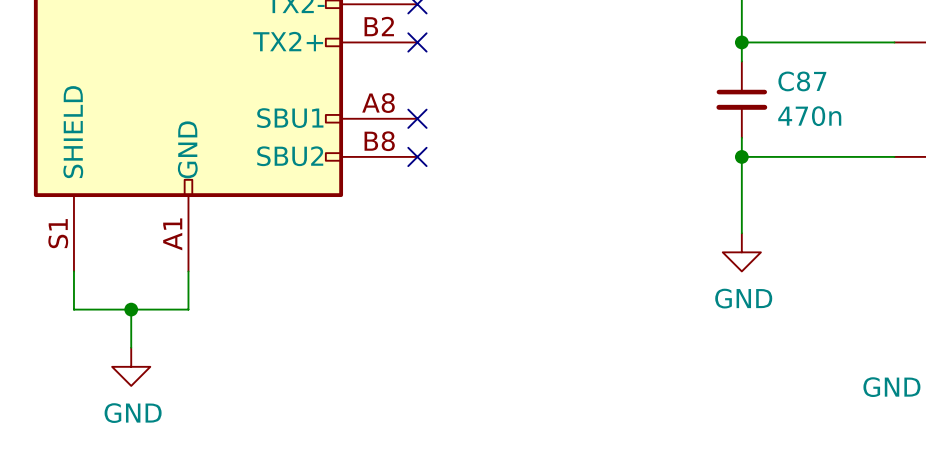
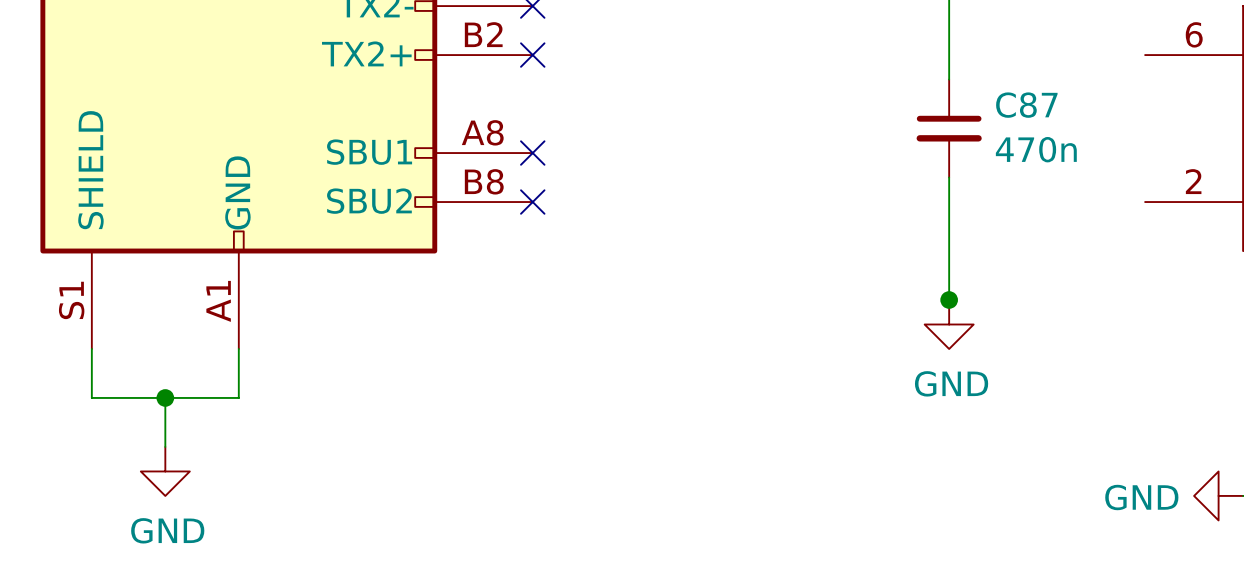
wire: (741, 42) (894, 42) -> none
junction: (741, 42) -> none
wire: (741, 156) (894, 156) -> none
junction position: (741, 156) -> (949, 300)

